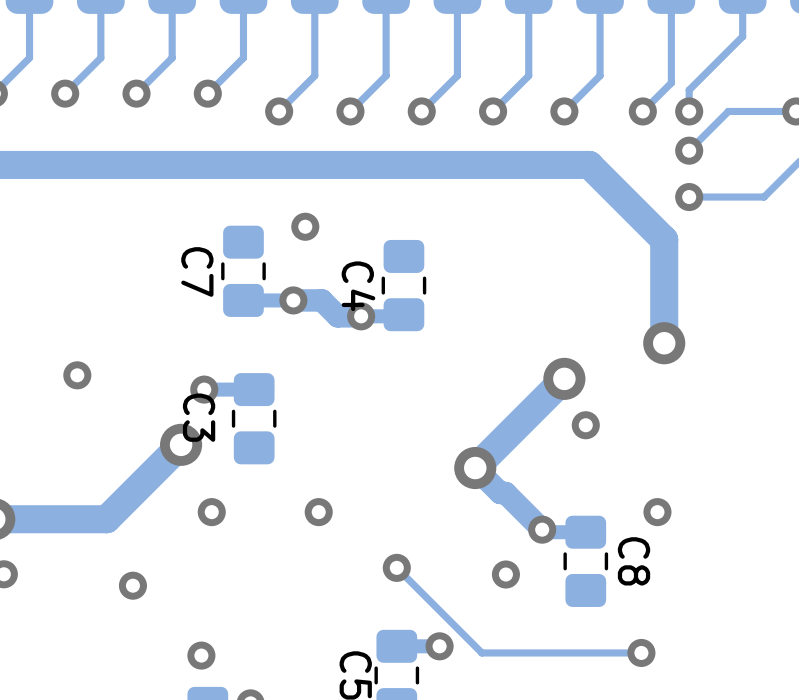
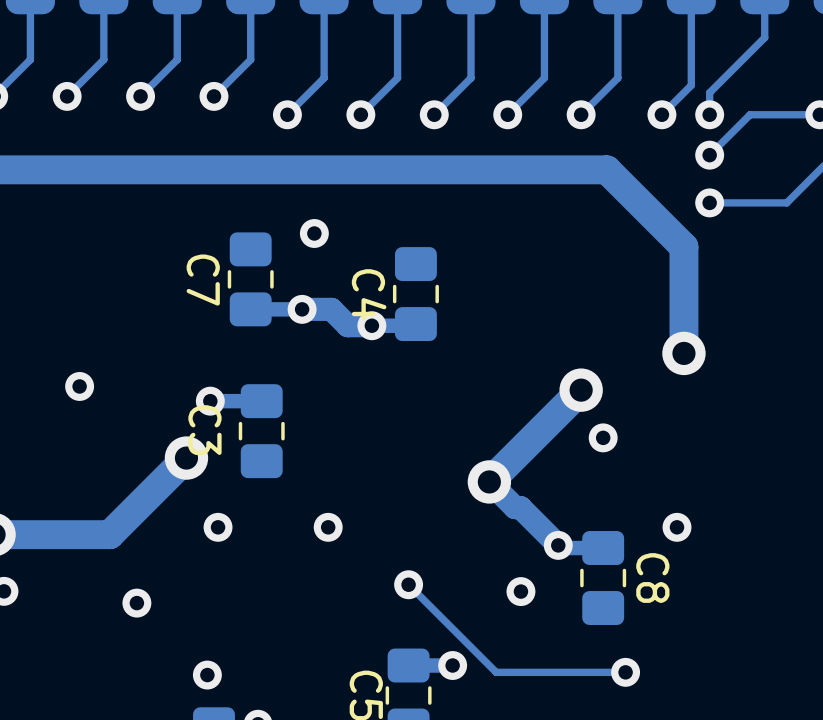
track: (641, 652) (607, 652) -> none
via position: (641, 652) -> (625, 672)

